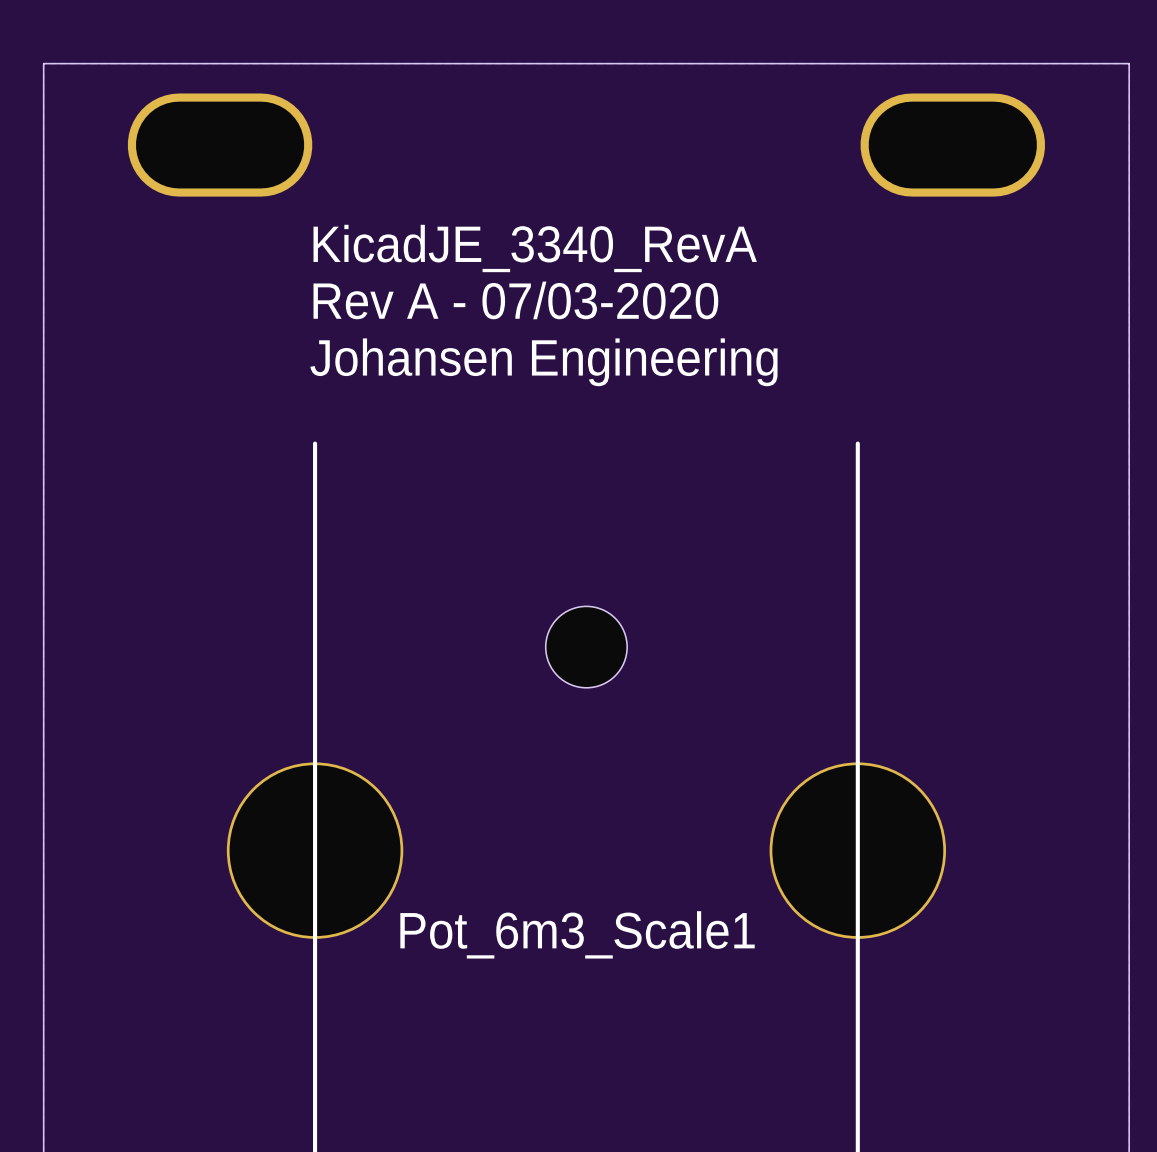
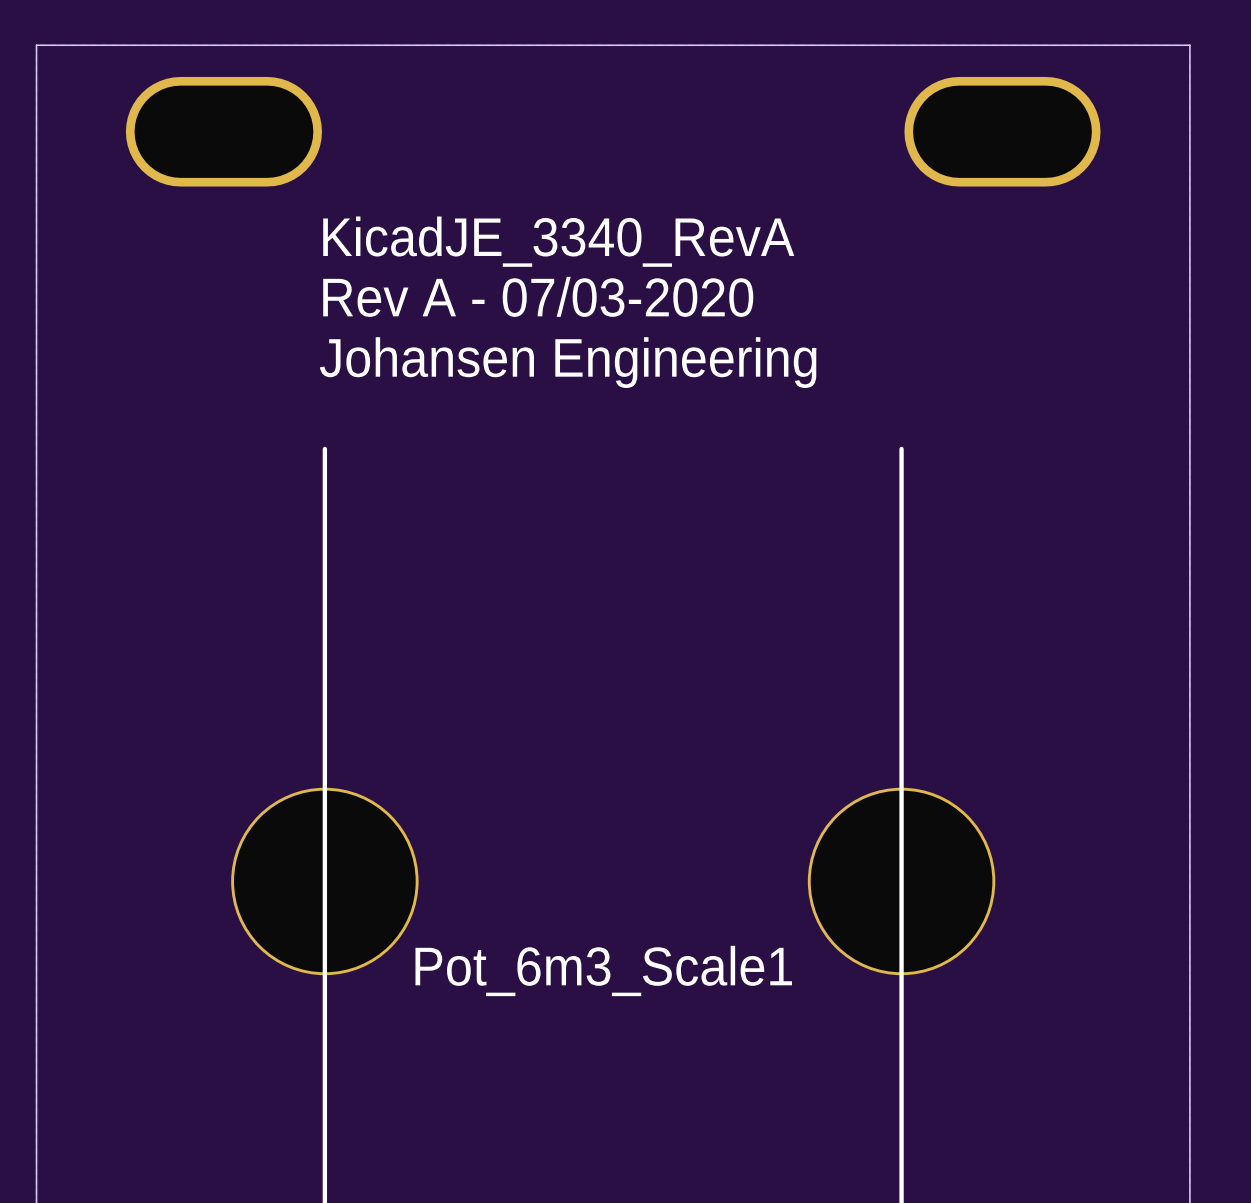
part: (586, 647) -> none

